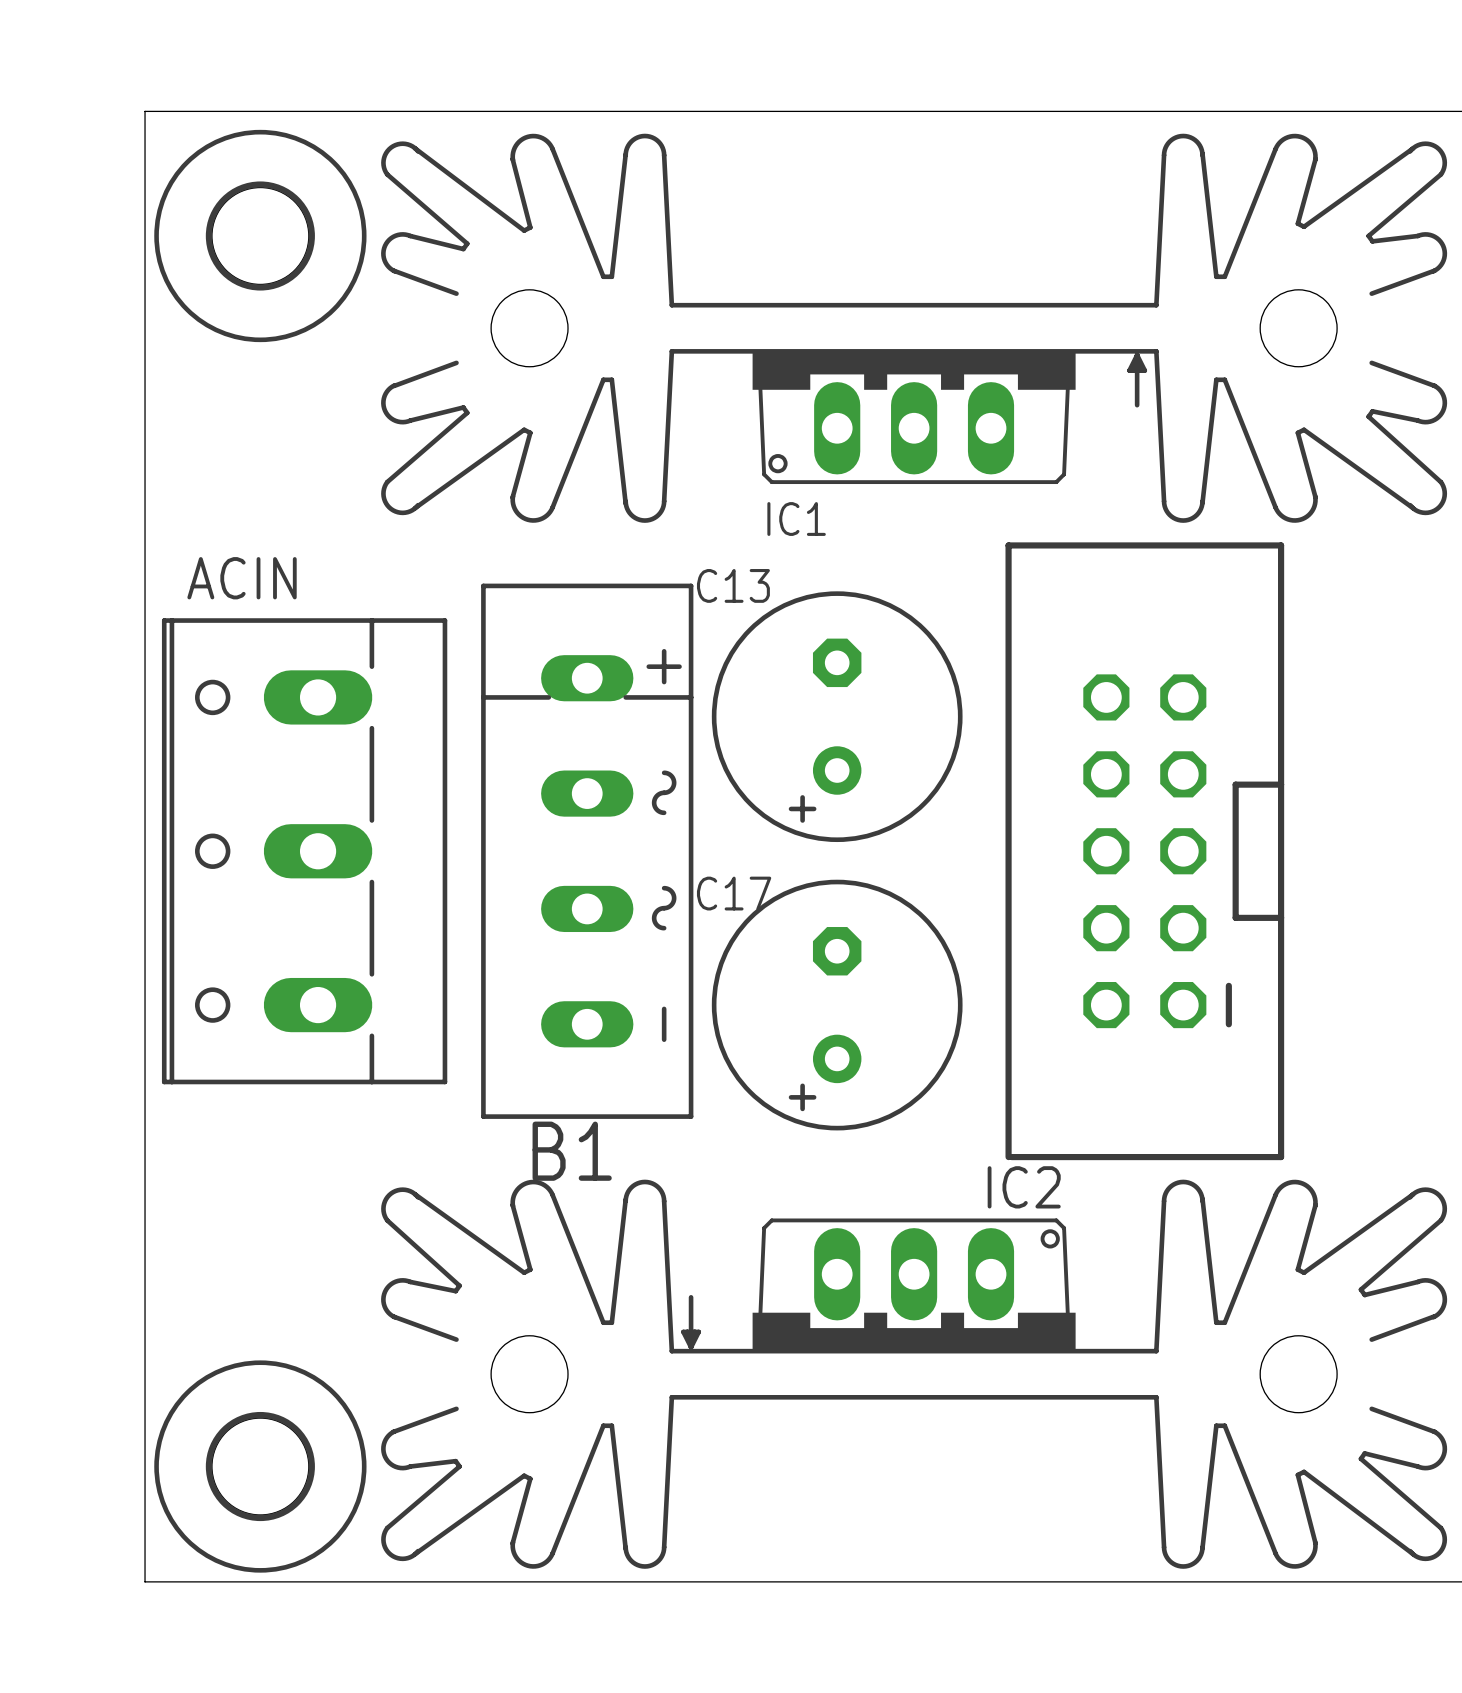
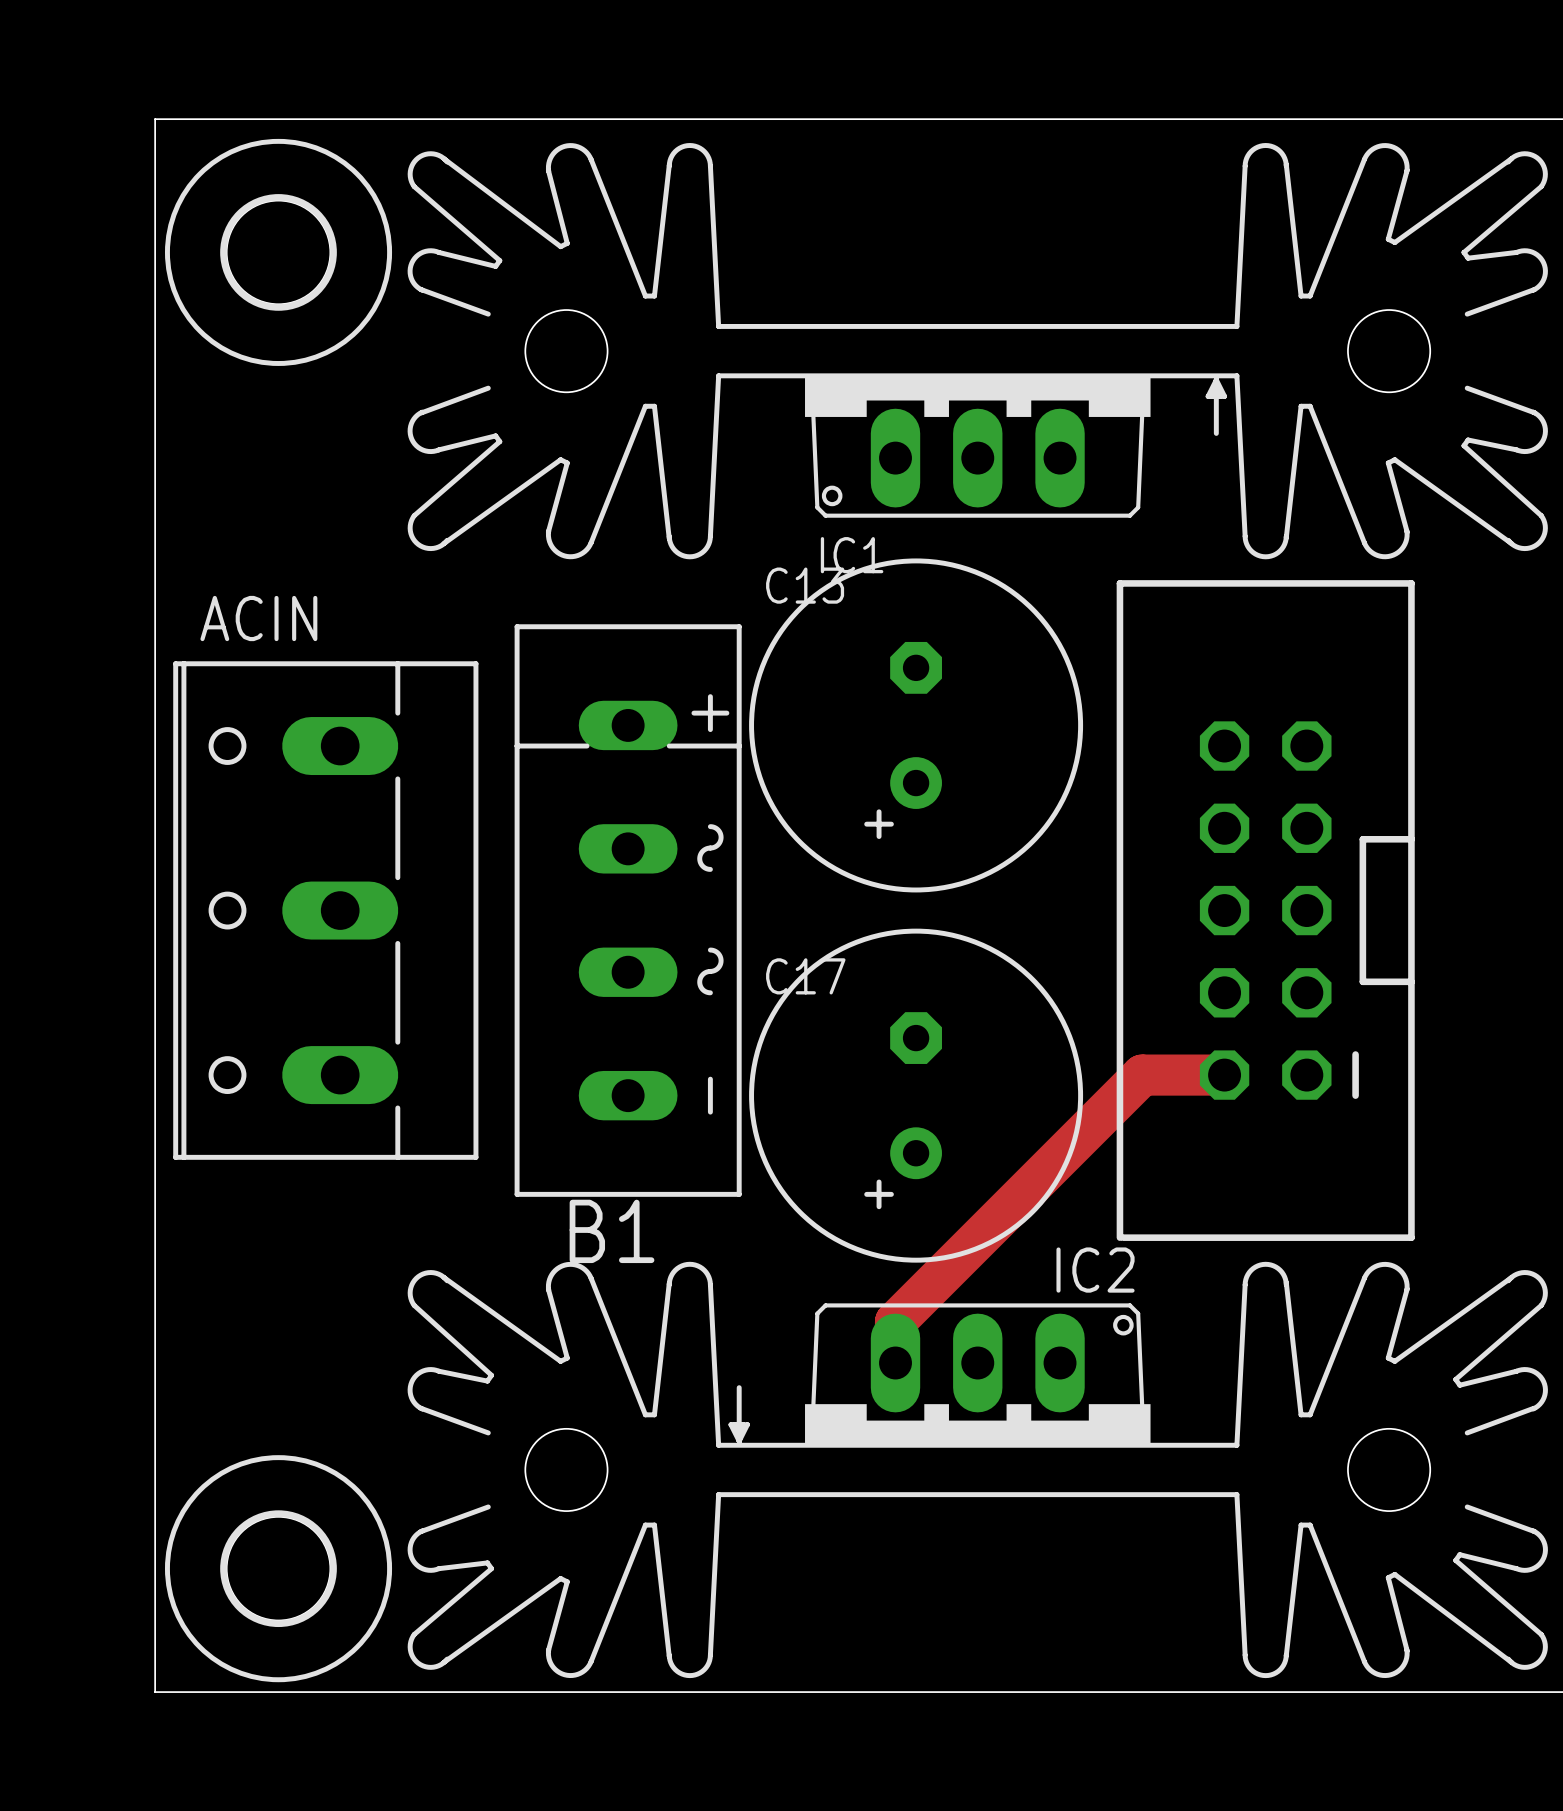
C13 footprint: [711, 591, 963, 843] -> [749, 558, 1084, 893]
part position: (1144, 851) -> (1265, 910)
C17 footprint: [711, 879, 963, 1131] -> [749, 928, 1084, 1263]
track: none -> (1224, 1075) (1142, 1075) (895, 1321) (895, 1363)

